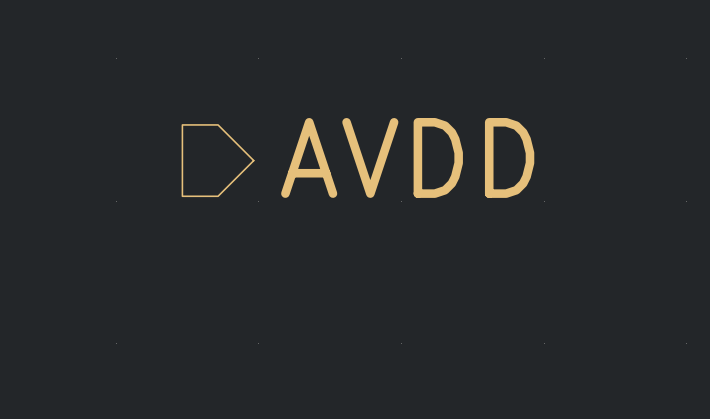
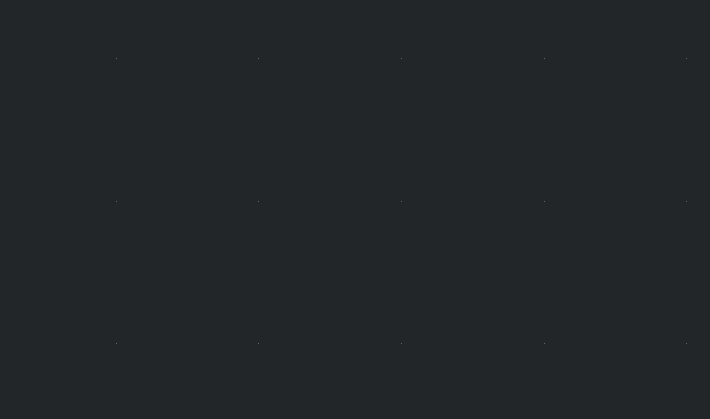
hierarchical label: AVDD (407, 157) -> none

